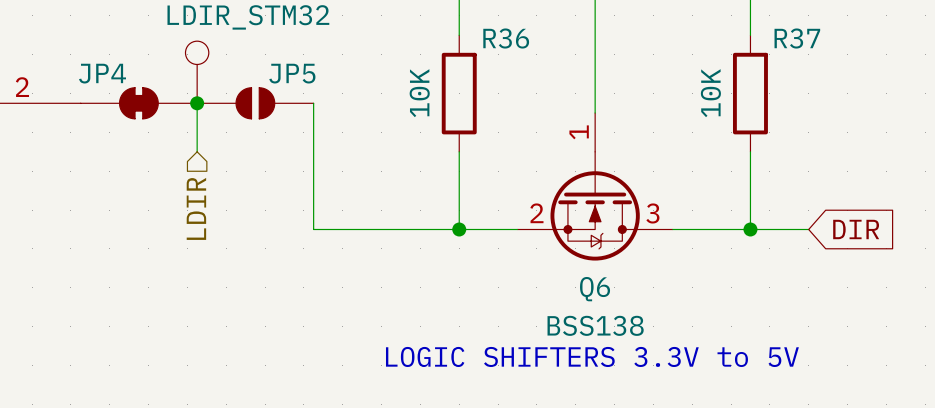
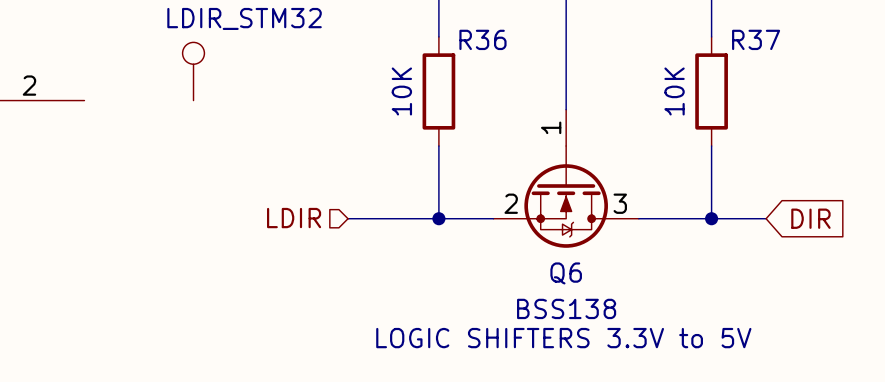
JP4: (138, 103) -> none
wire: (197, 103) (197, 151) -> none
junction: (197, 103) -> none
JP5: (255, 103) -> none
wire: (313, 103) (313, 229) (362, 229) -> none
hierarchical label rotation: 0° (196, 208) -> 90° clockwise (294, 218)
hierarchical label position: LDIR (196, 208) -> LDIR (294, 218)

